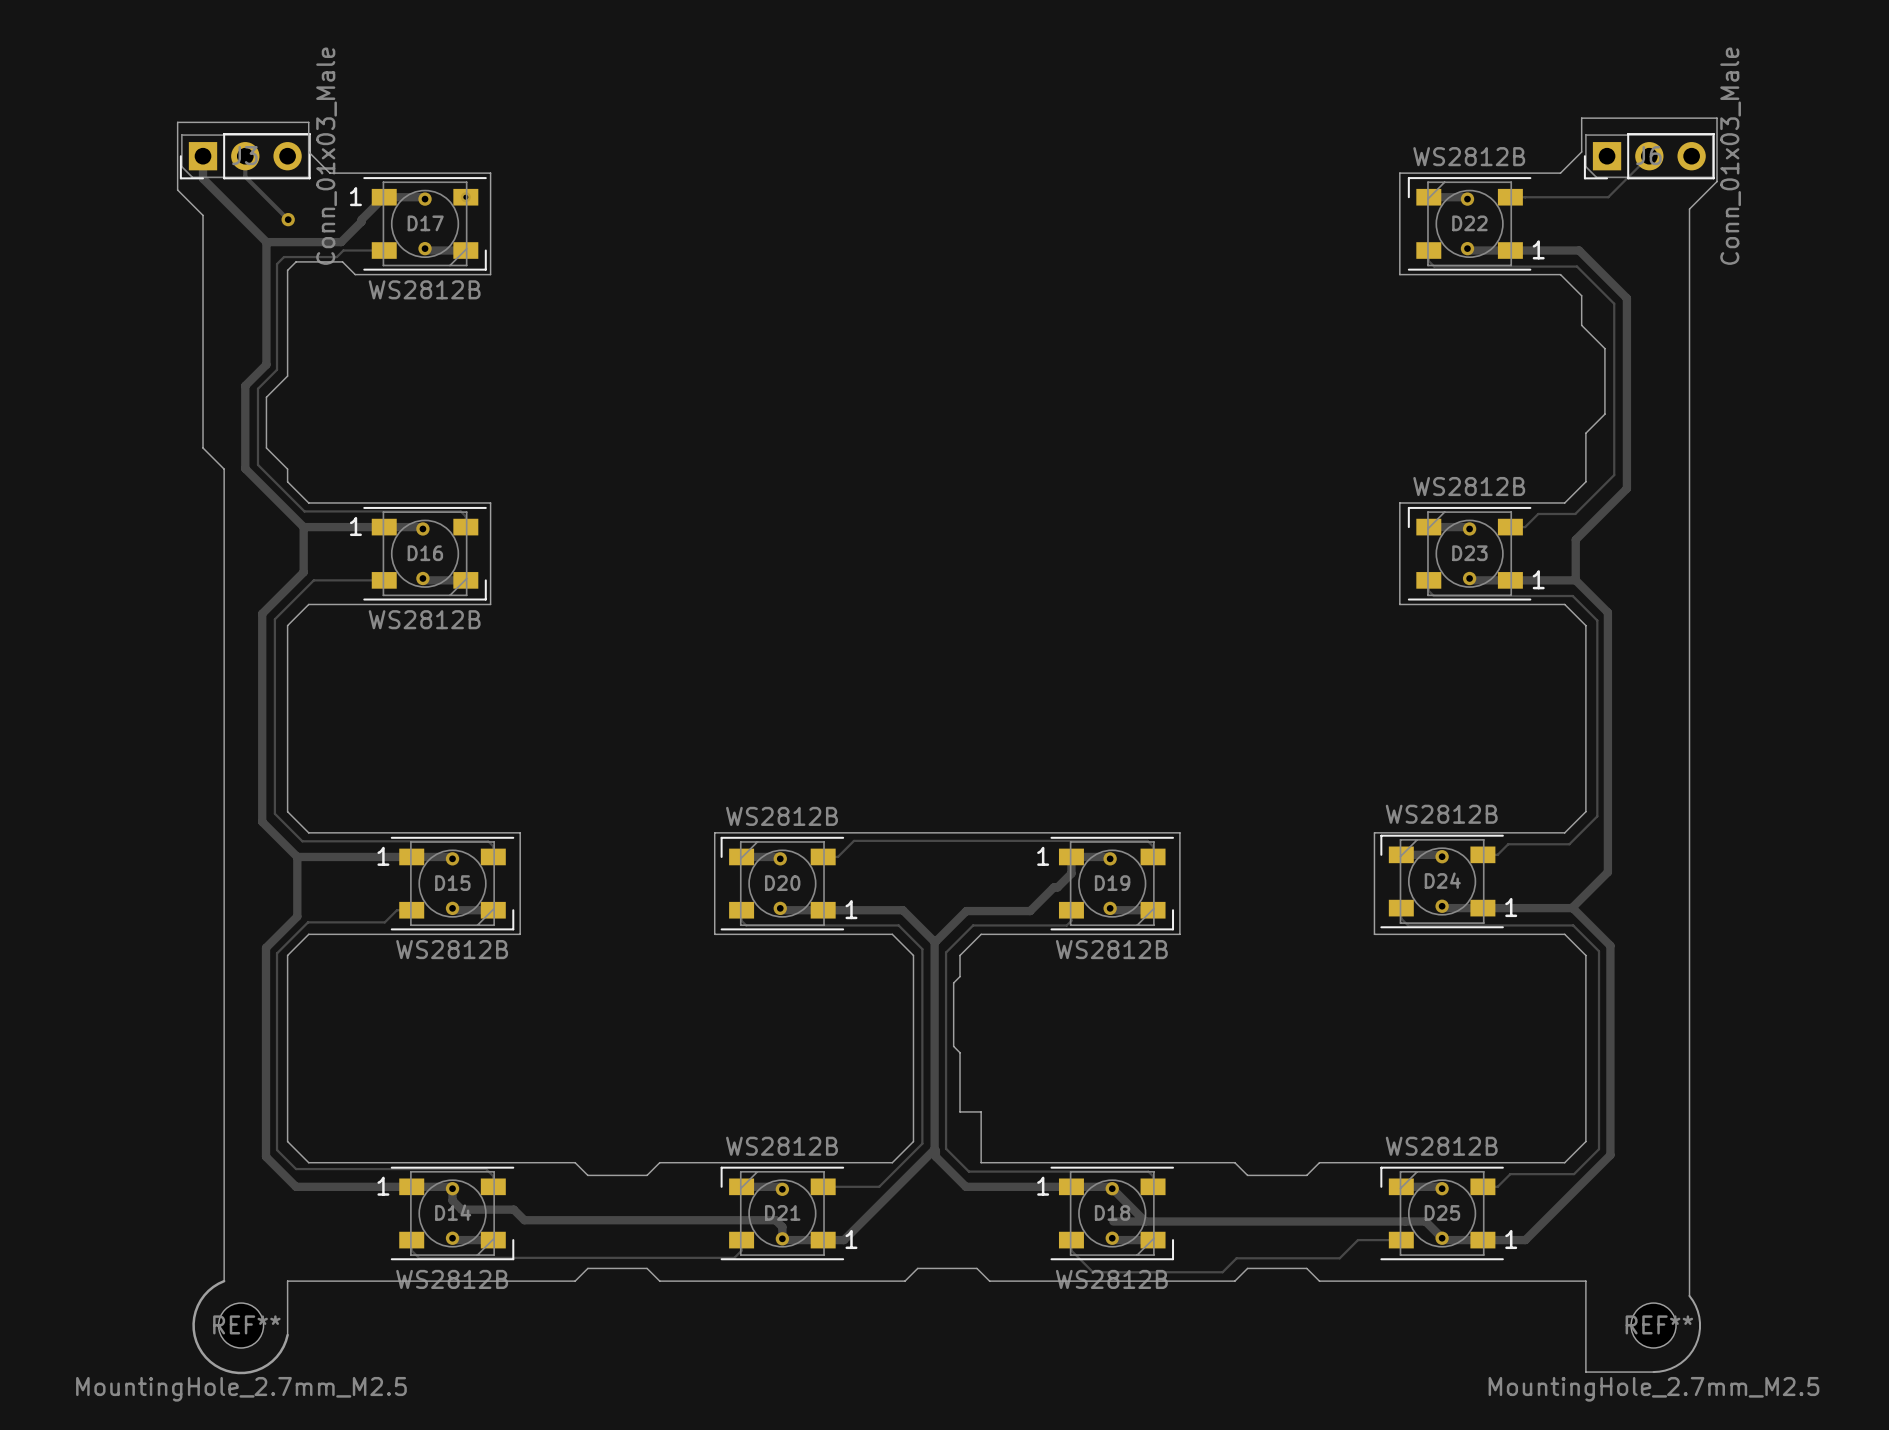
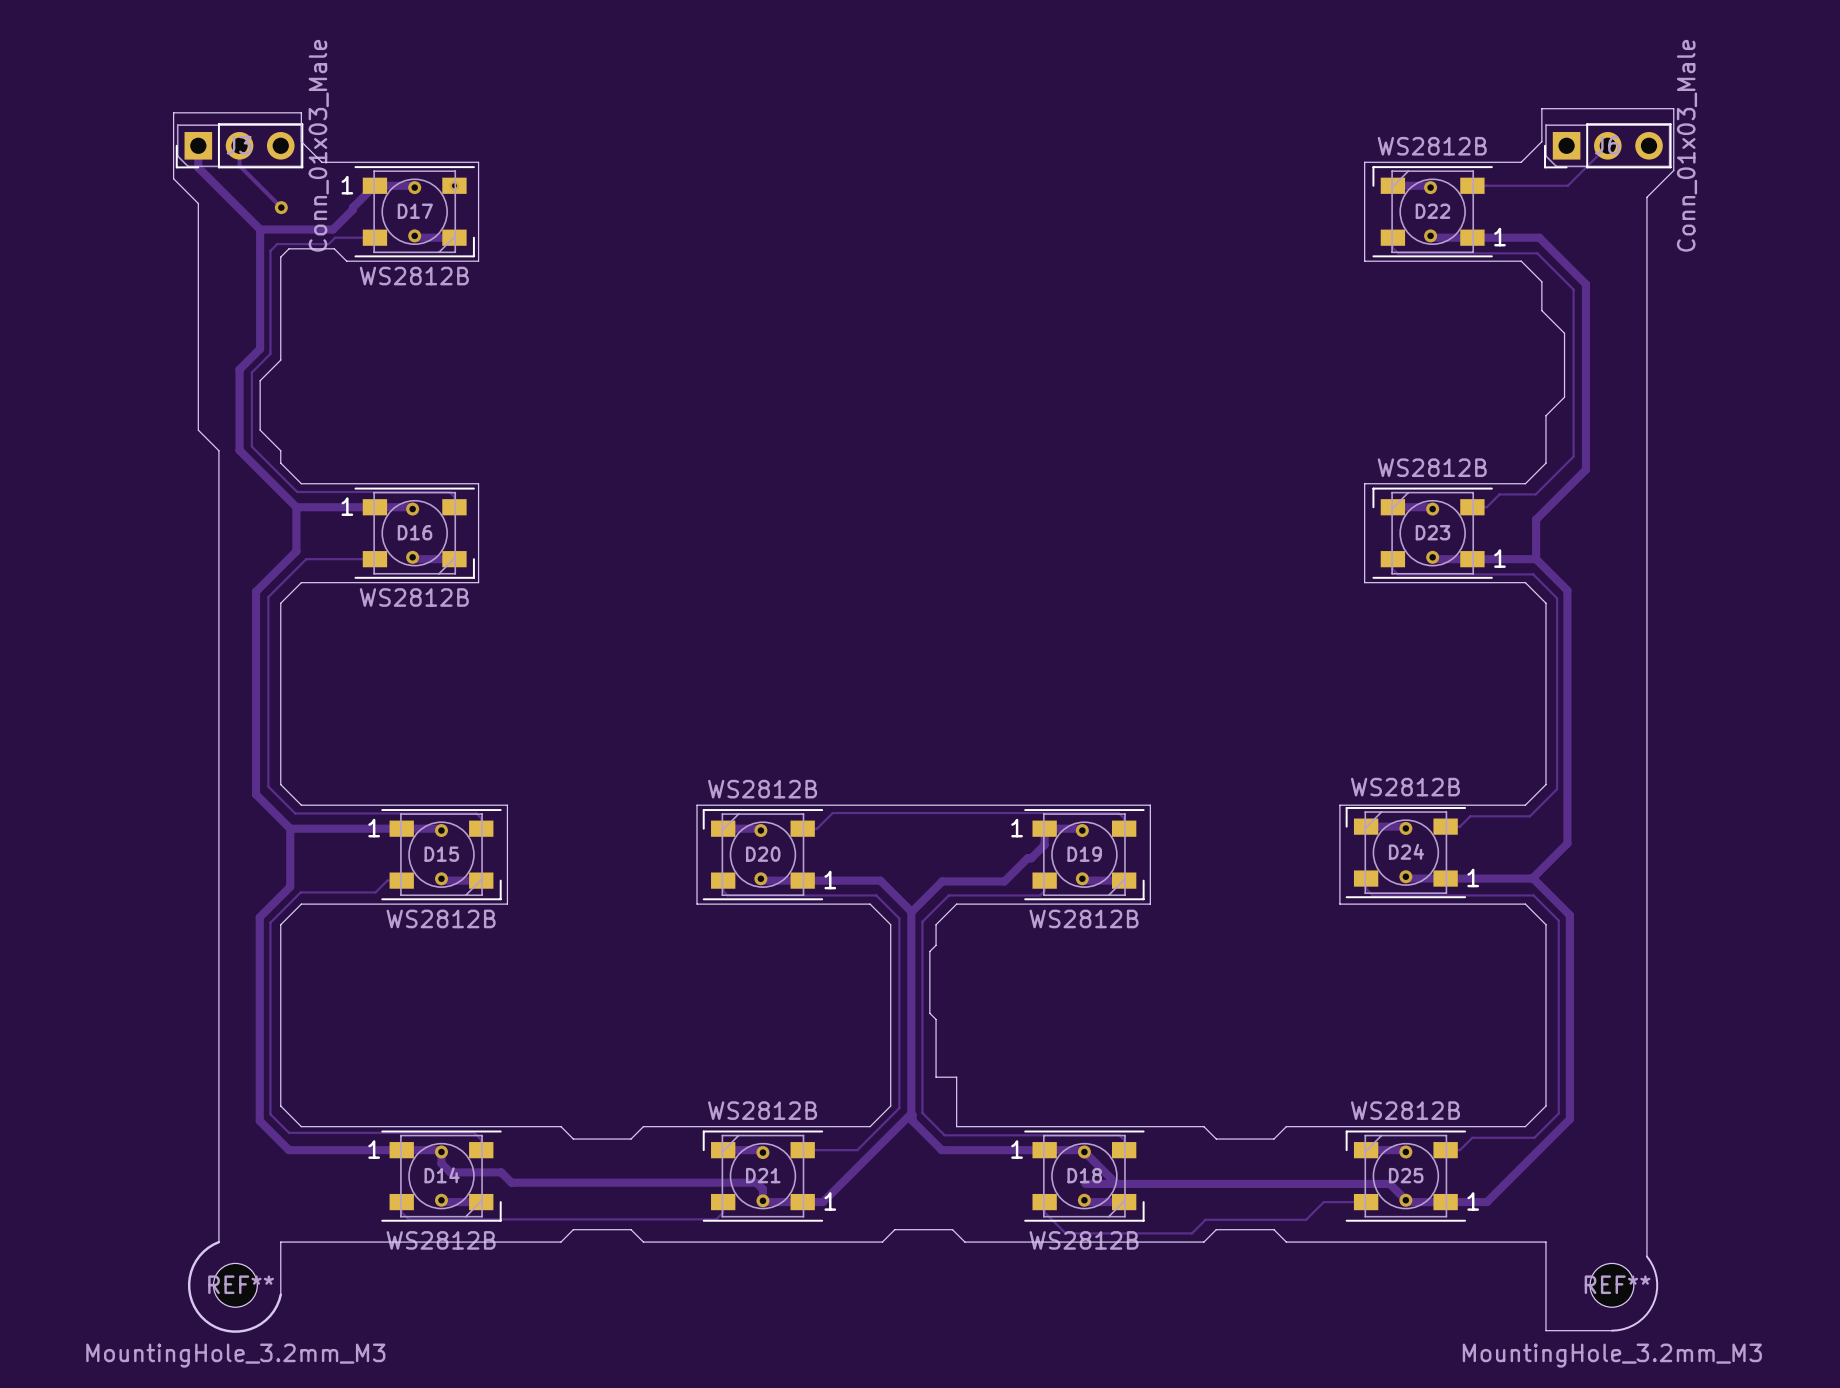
REF** value: MountingHole_2.7mm_M2.5 (241, 1389) -> MountingHole_3.2mm_M3 (235, 1355)
REF** value: MountingHole_2.7mm_M2.5 (1653, 1389) -> MountingHole_3.2mm_M3 (1612, 1355)

